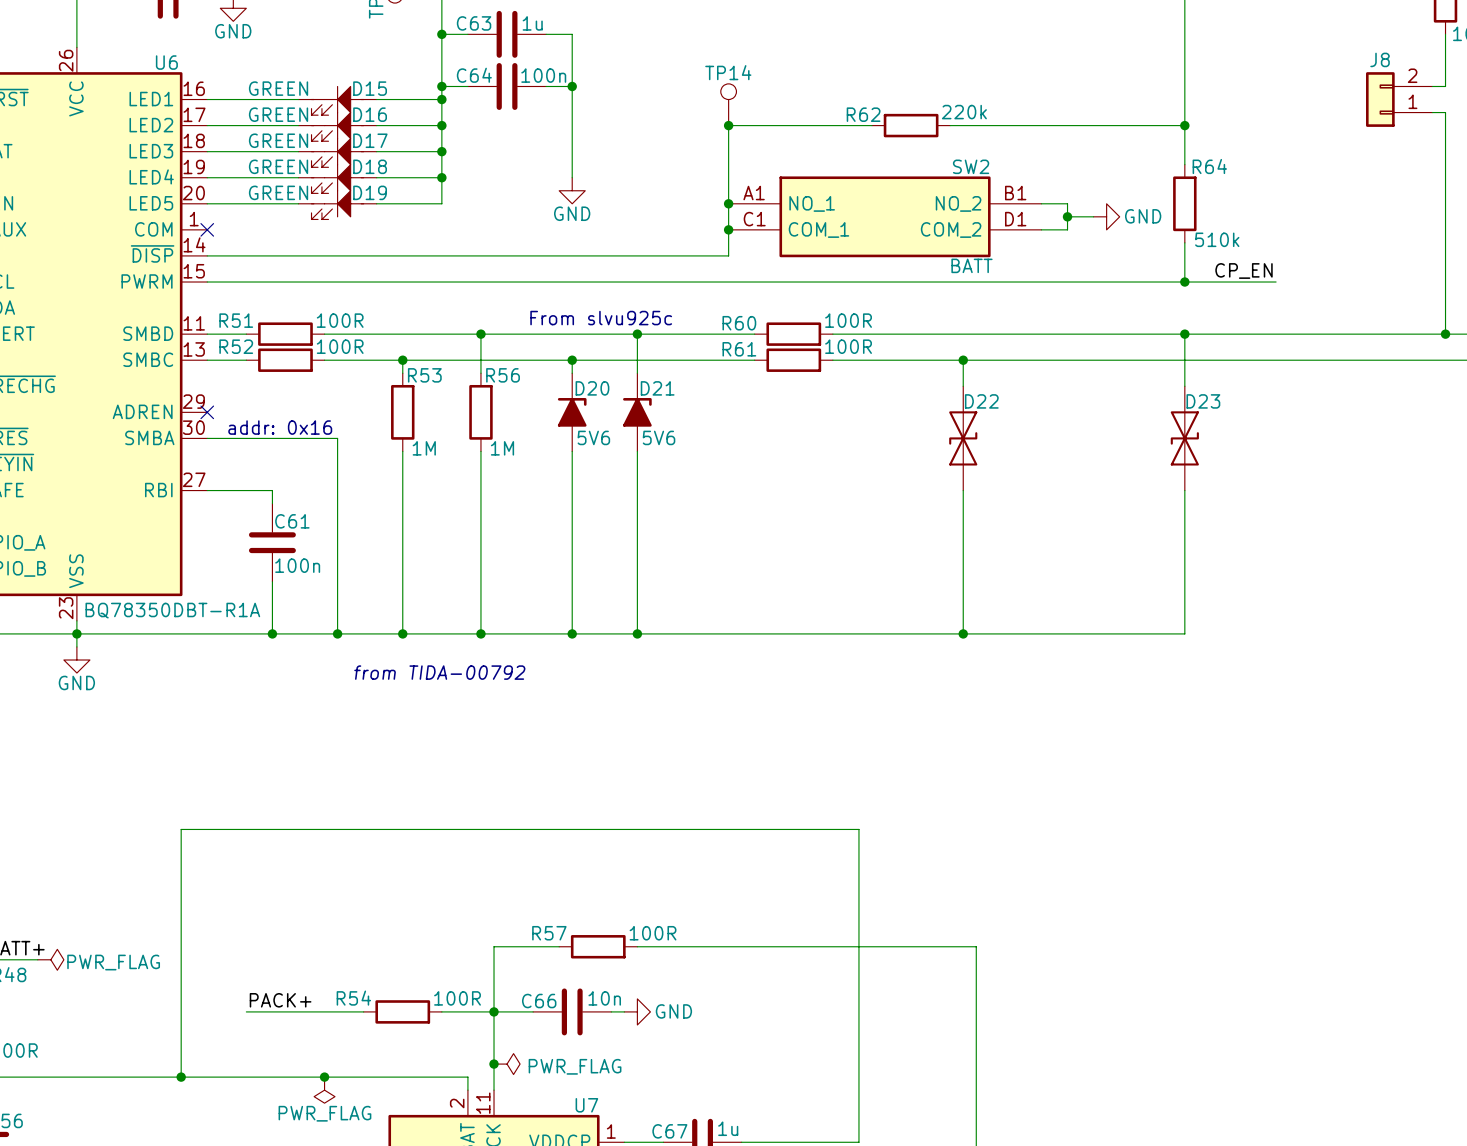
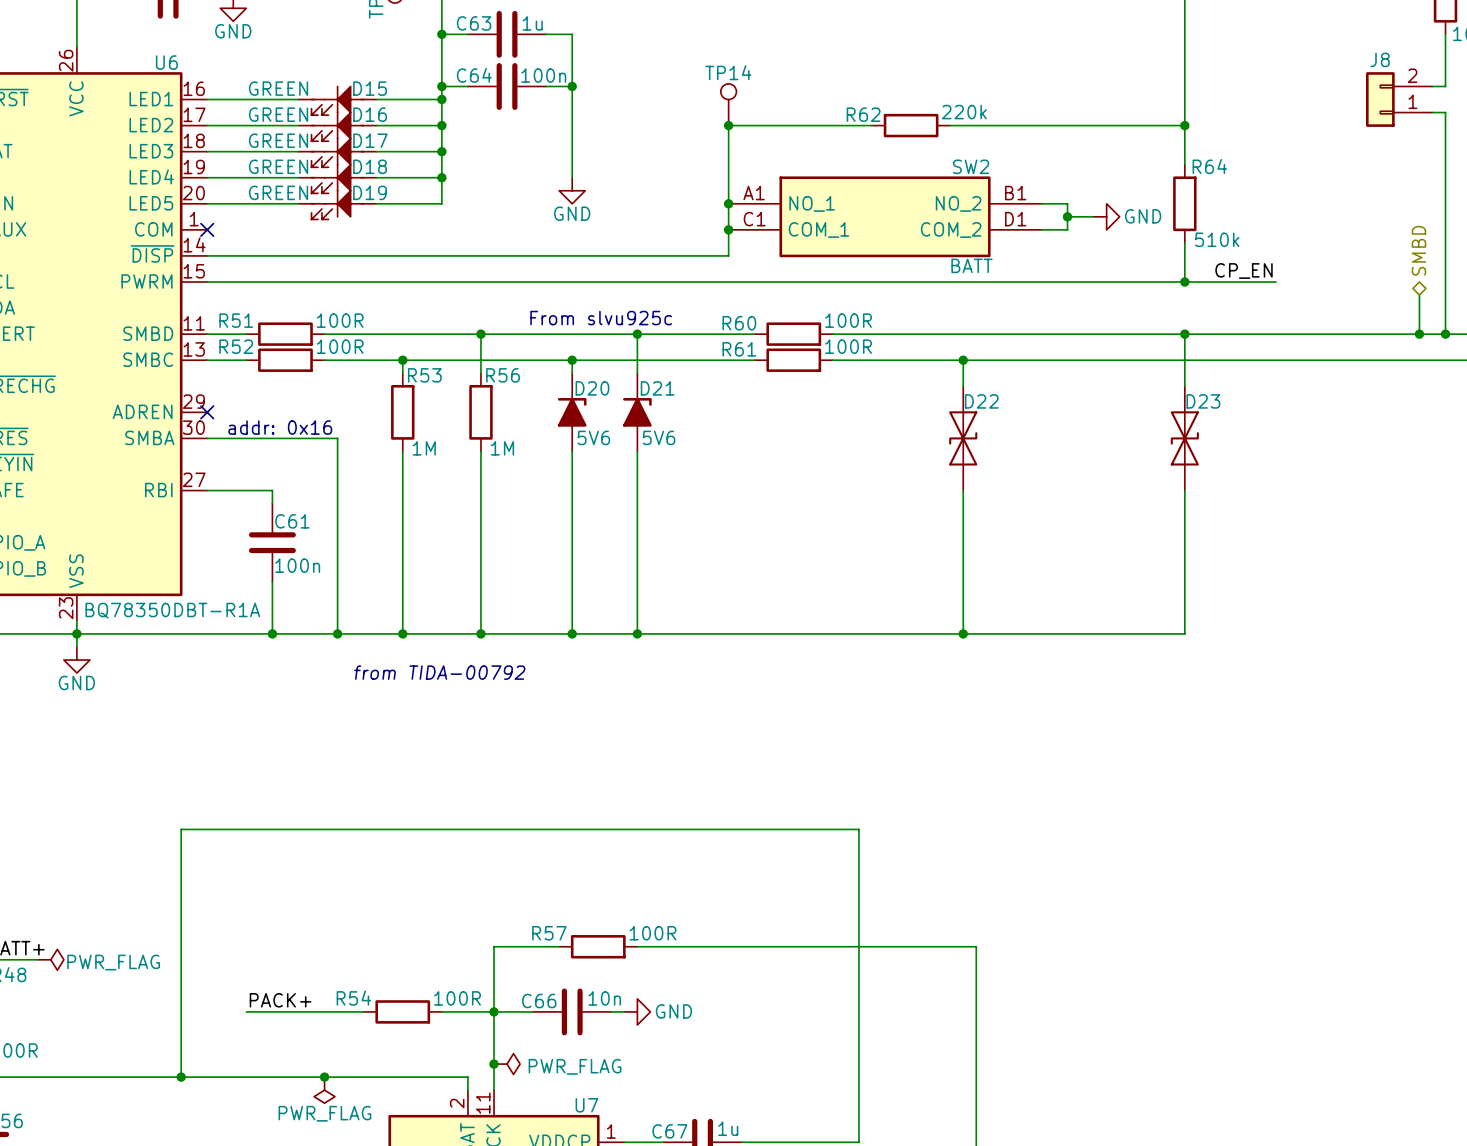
hierarchical label: none -> SMBD (1418, 250)
wire: none -> (1419, 295) (1419, 334)
junction: none -> (1419, 334)

